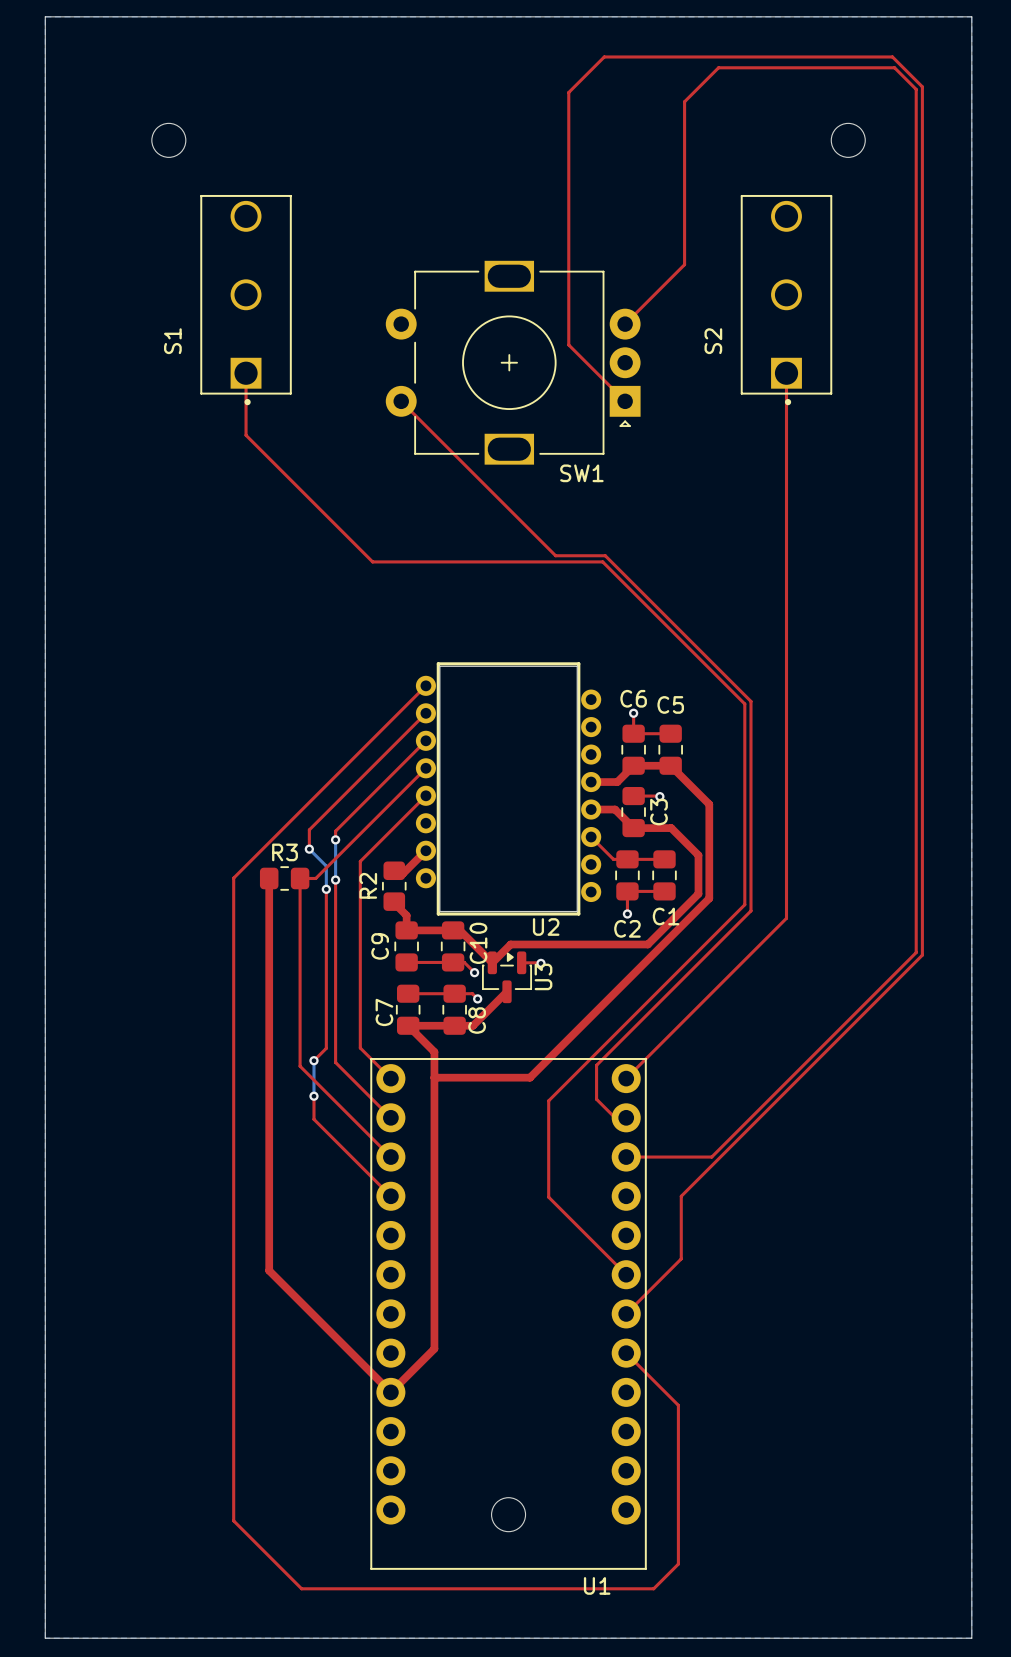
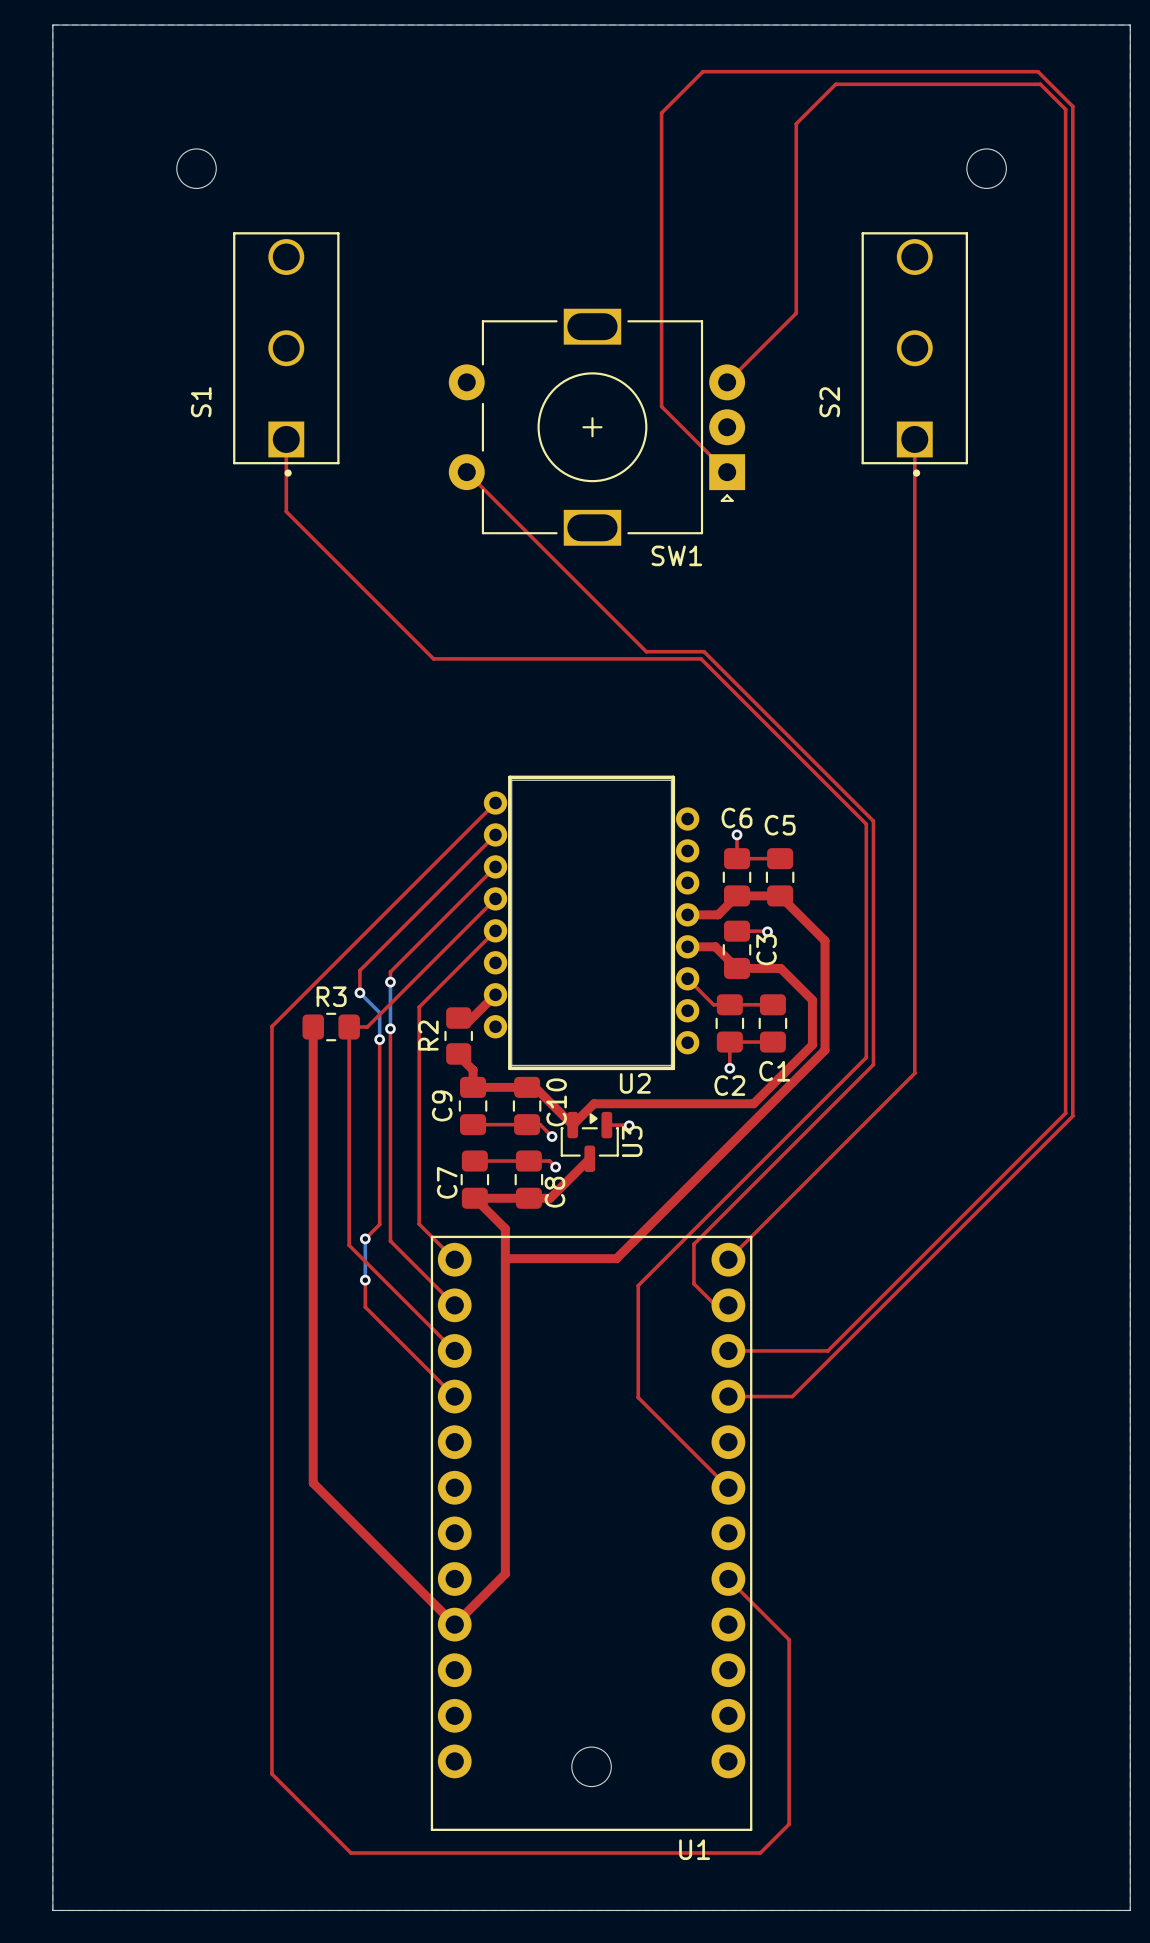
top track: (681, 1196) (681, 1258) (626, 1313) -> (792, 1396) (728, 1396)

